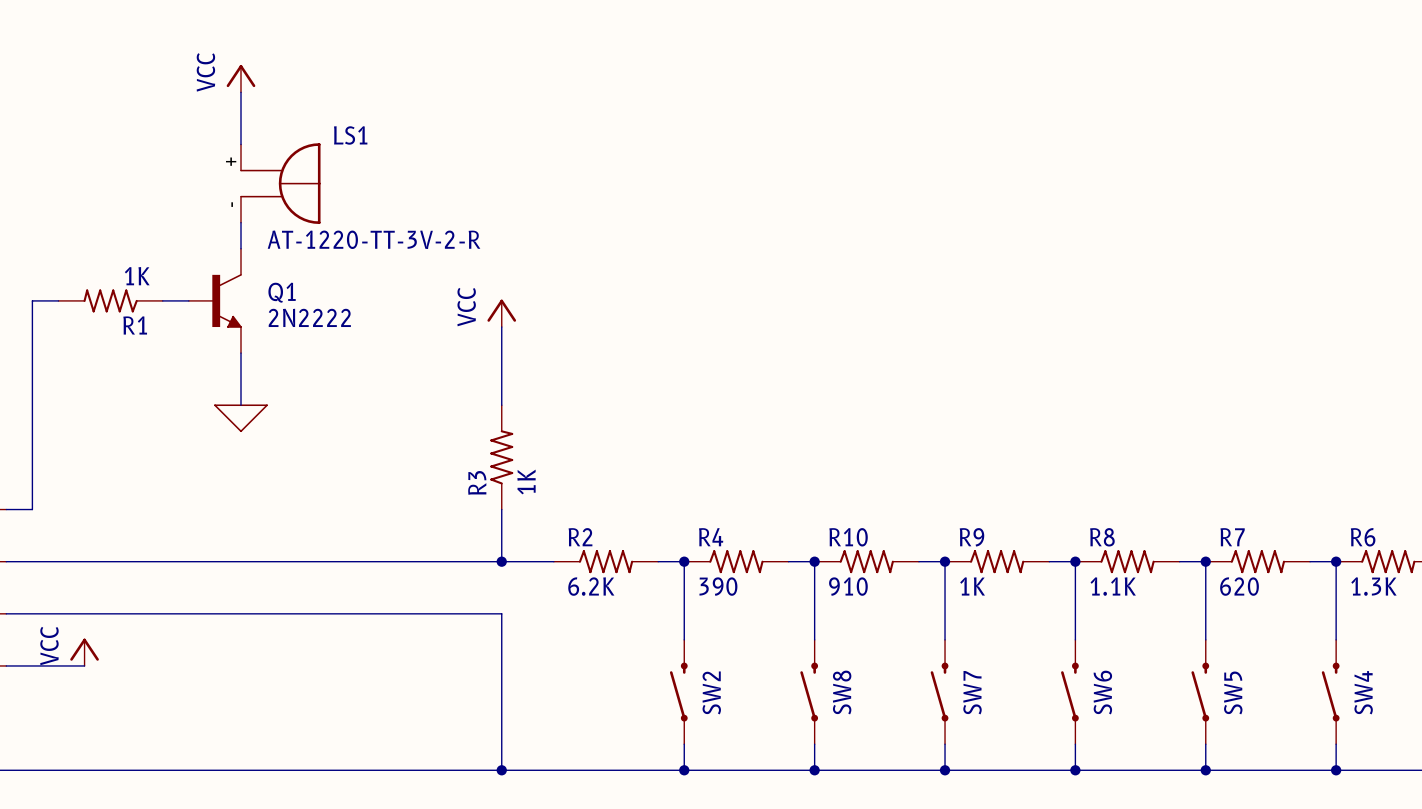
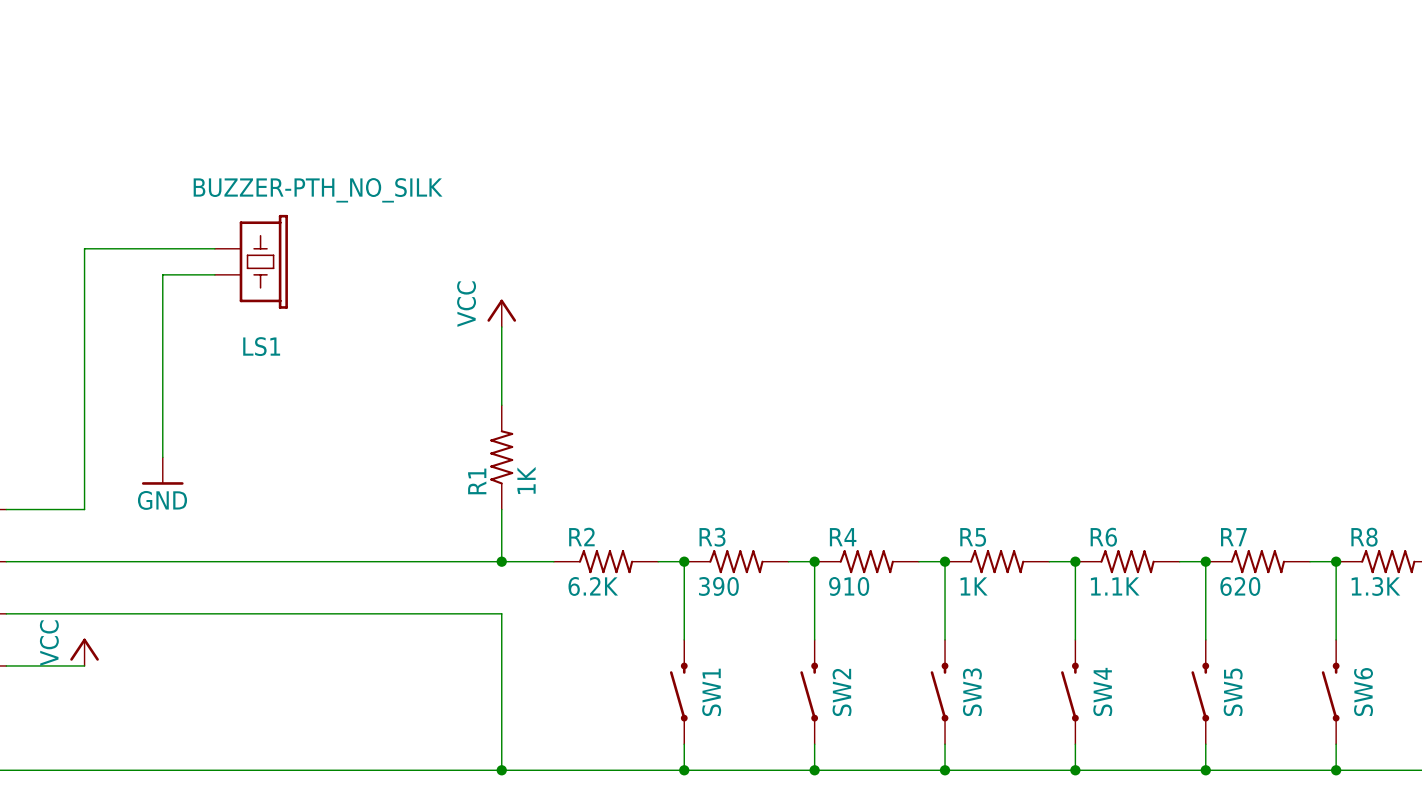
power symbol: VCC (241, 78) -> none
wire: (241, 92) (241, 144) -> none
LS1 name position: LS1 (350, 135) -> LS1 (261, 346)
LS1 symbol: [240, 143, 321, 225] -> [214, 214, 288, 309]
LS1 value: AT-1220-TT-3V-2-R (374, 239) -> BUZZER-PTH_NO_SILK (318, 190)
wire: none -> (214, 274) (162, 274) (162, 457)
wire: (58, 300) (32, 300) (32, 509) -> (214, 248) (84, 248) (84, 509) (32, 509)
R1: 1K (110, 300) -> none
wire: (162, 300) (188, 300) -> none
Q1: 2N2222 (215, 300) -> none
wire: (241, 353) (241, 405) -> none
power symbol: (241, 418) -> none
power symbol: none -> GND (162, 471)
R3 name: R3 (477, 482) -> R1 (477, 481)
R4 name: R4 (711, 537) -> R3 (712, 537)
R10 name: R10 (848, 537) -> R4 (843, 537)
R9 name: R9 (971, 537) -> R5 (973, 537)
R8 name: R8 (1102, 537) -> R6 (1103, 537)
R6 name: R6 (1363, 537) -> R8 (1364, 537)
SW2 name: SW2 (711, 692) -> SW1 (711, 692)
SW8 name: SW8 (842, 692) -> SW2 (842, 692)
SW7 name: SW7 (972, 692) -> SW3 (972, 692)
SW6 name: SW6 (1102, 692) -> SW4 (1102, 691)
SW4 name: SW4 (1363, 692) -> SW6 (1363, 692)

